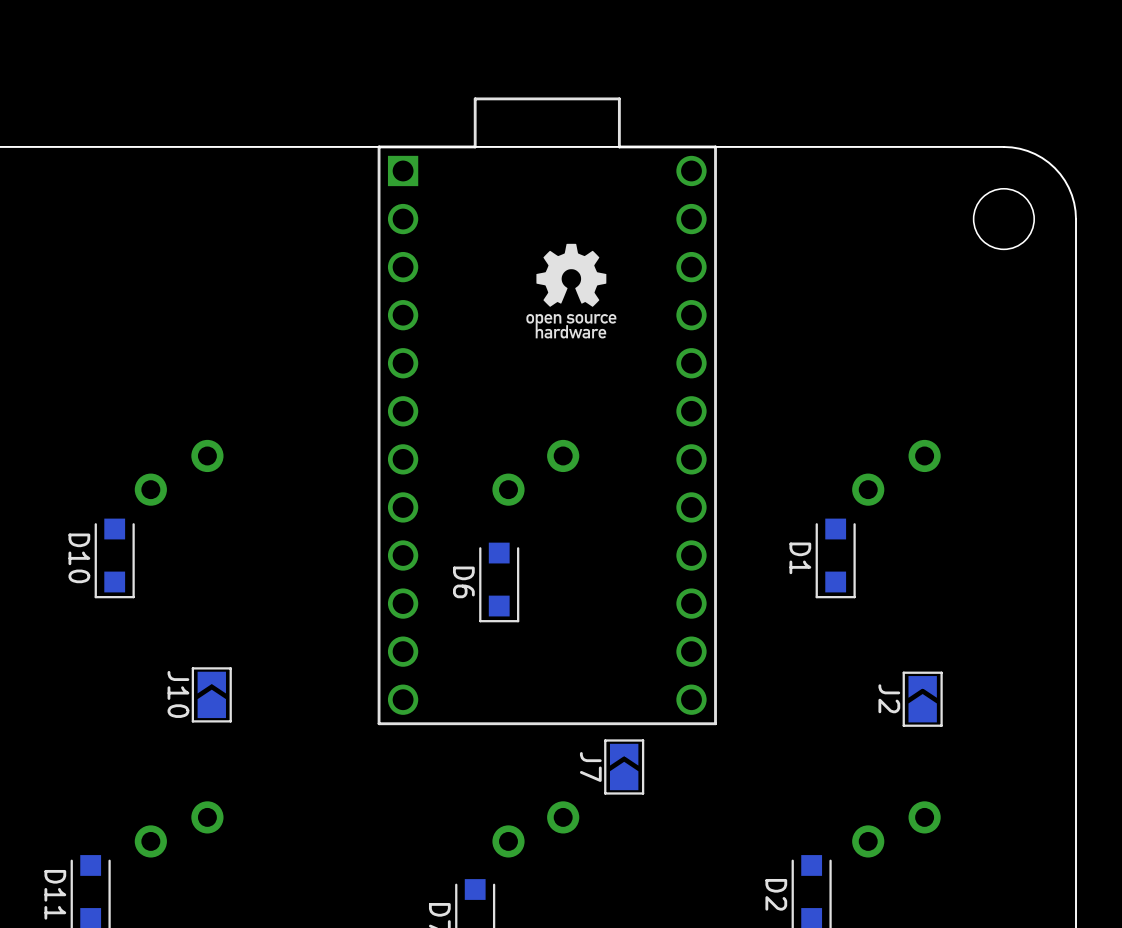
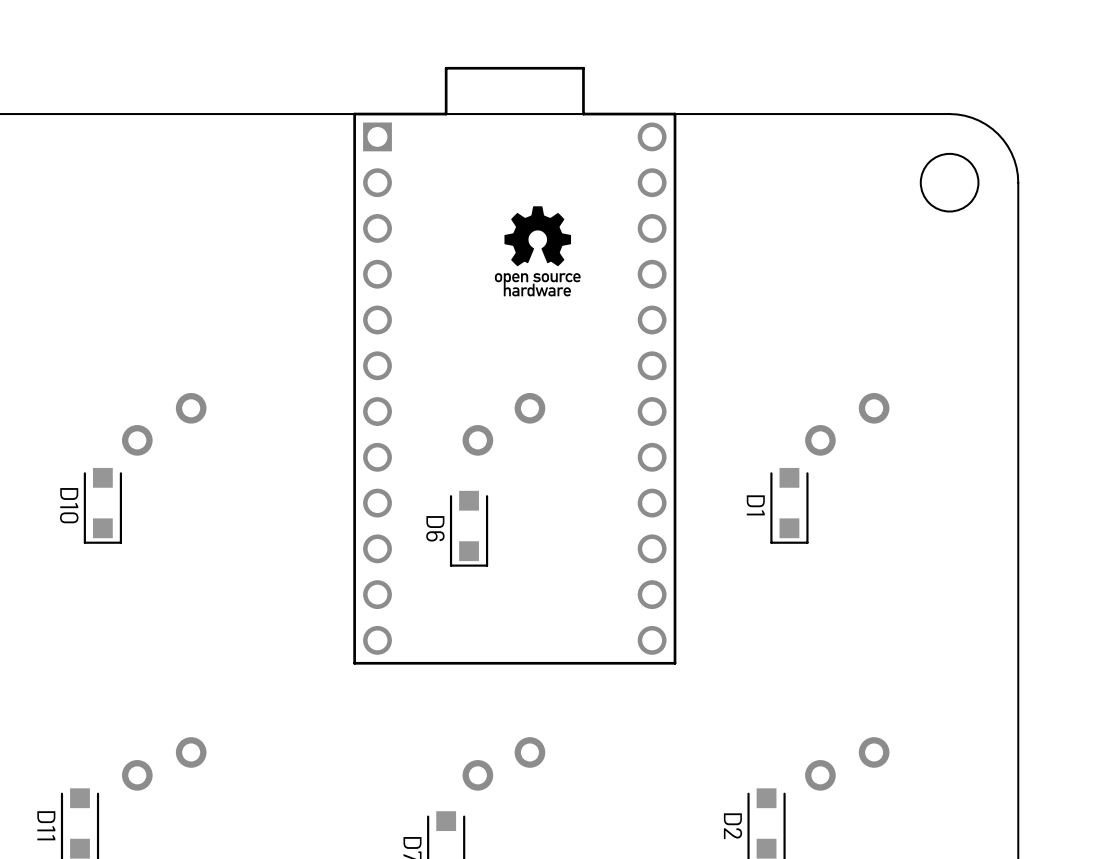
J10: (211, 694) -> none
J2: (922, 699) -> none
J7: (624, 766) -> none

